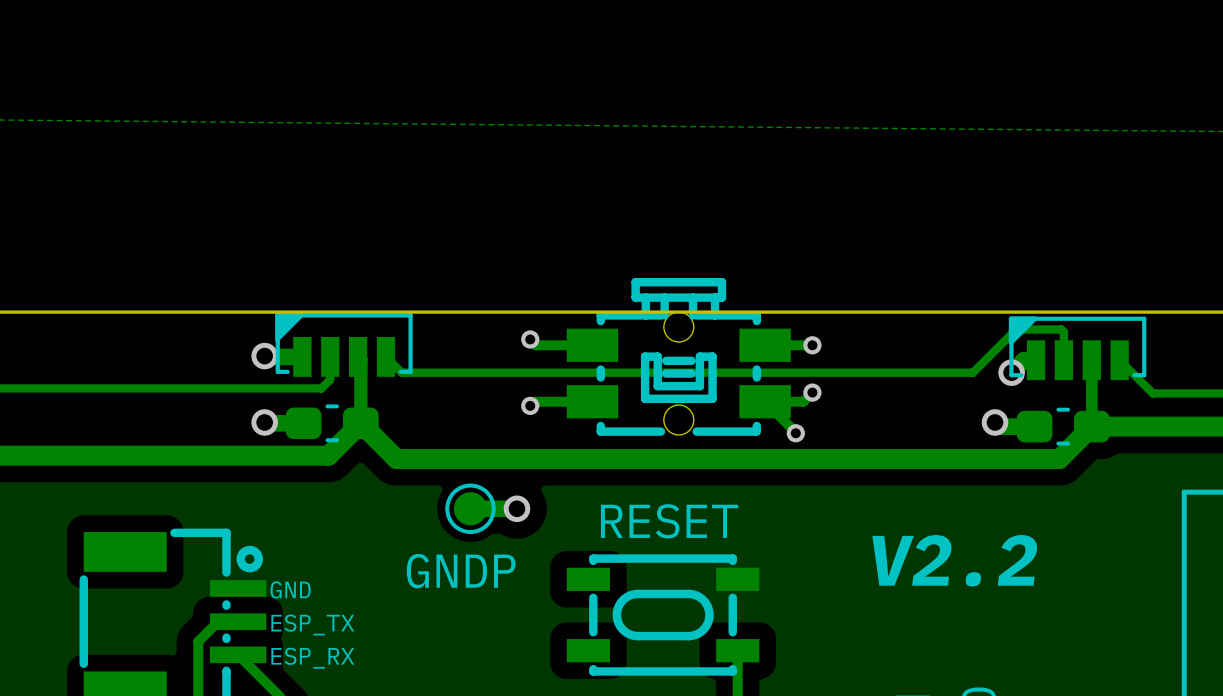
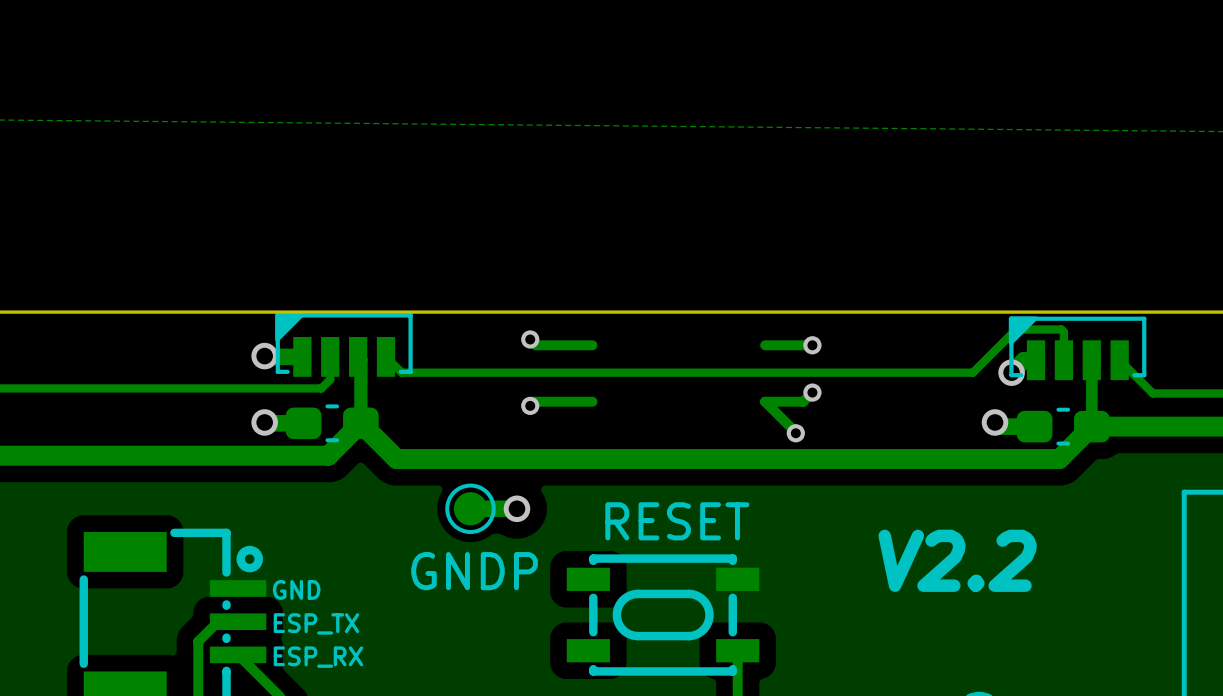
part: (678, 356) -> none

